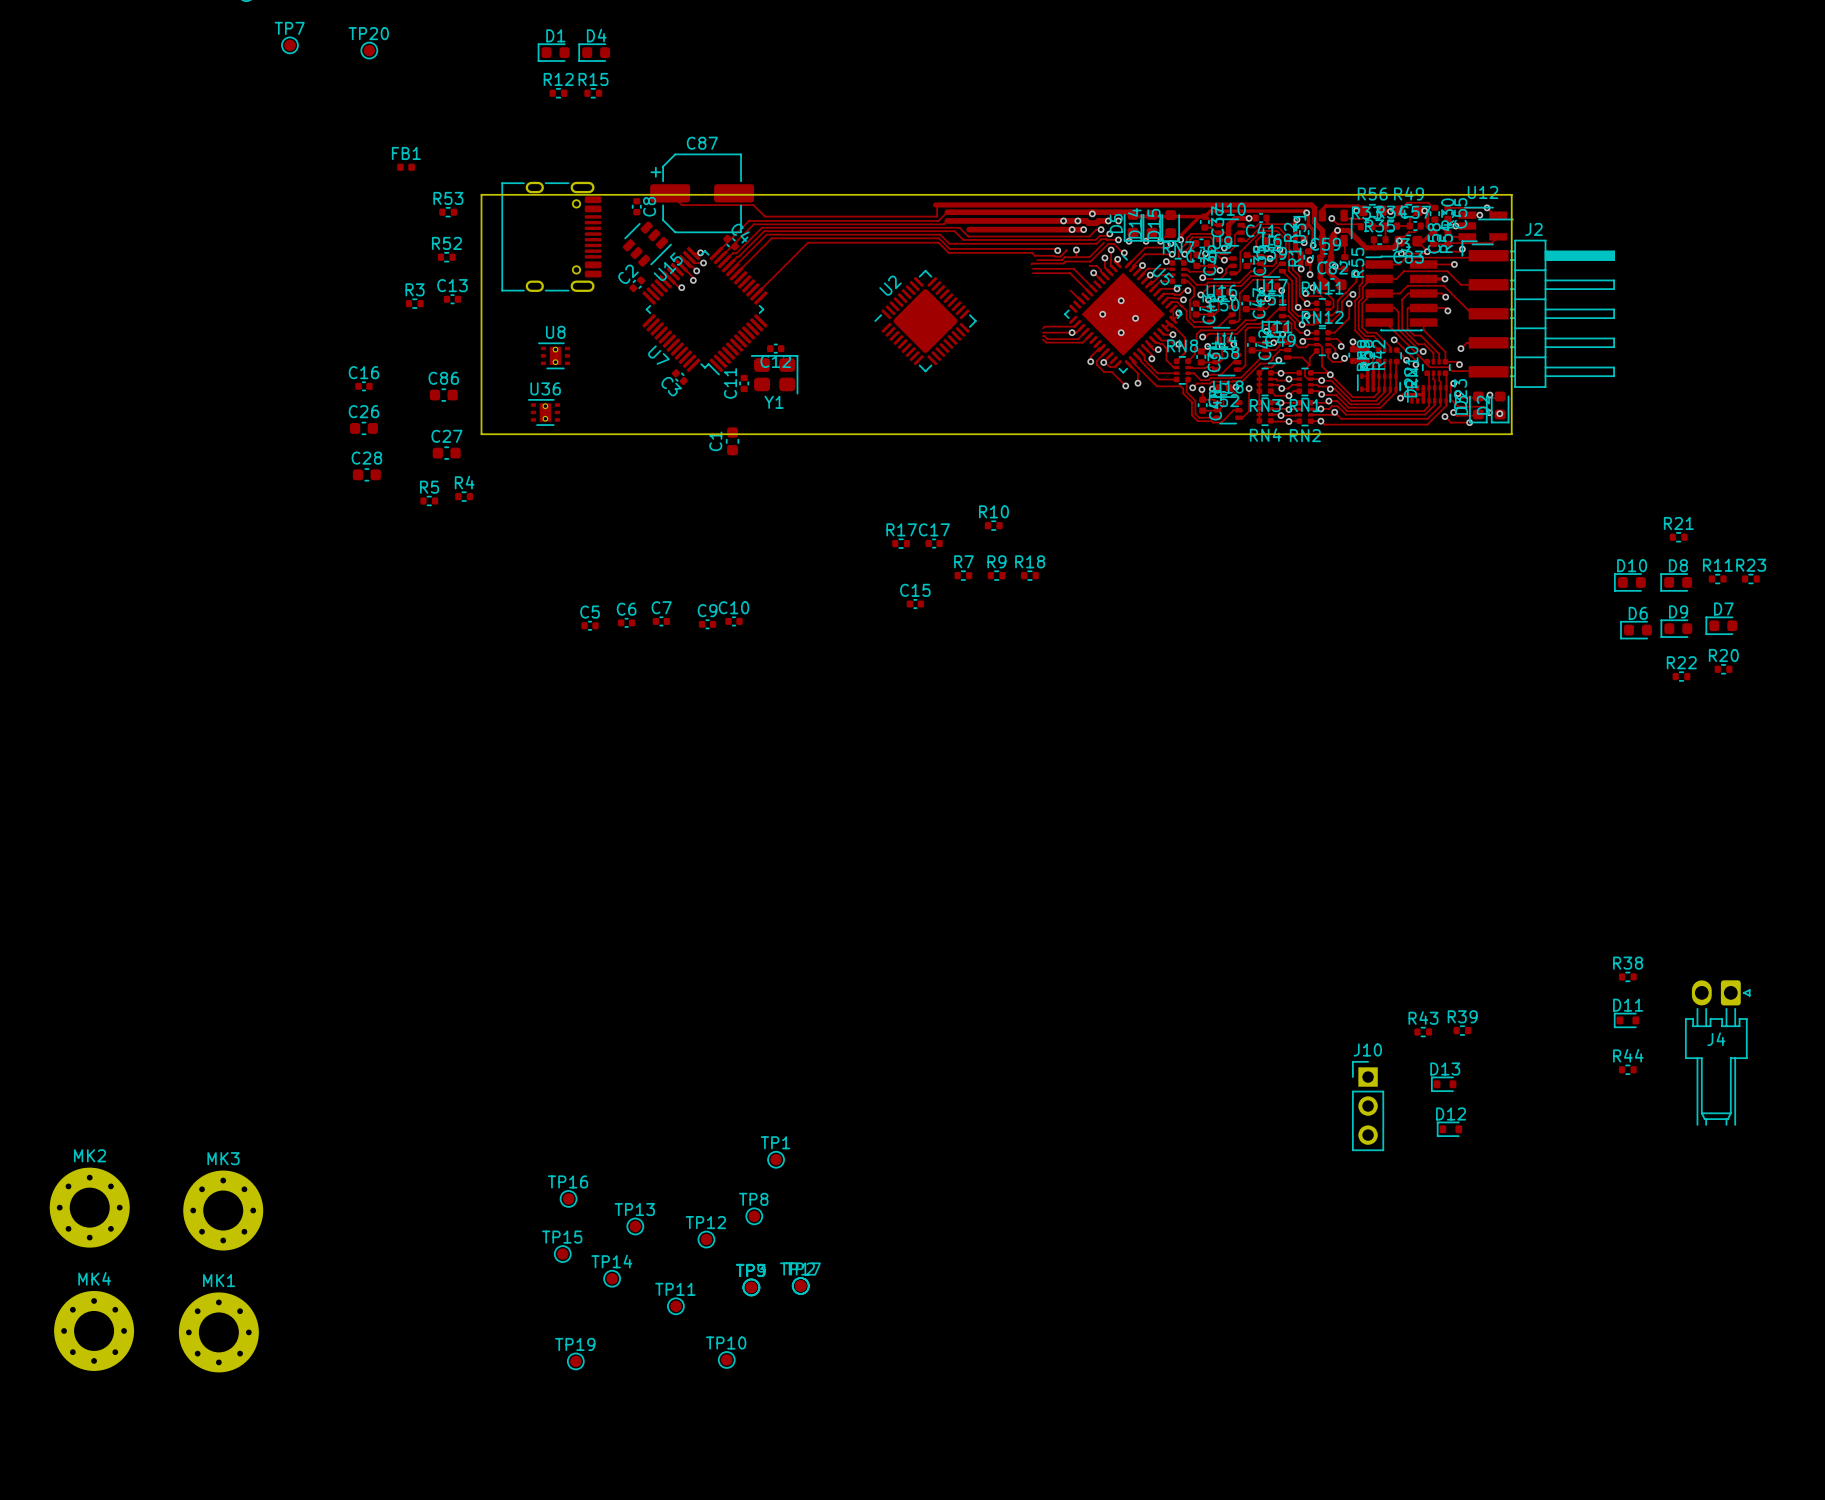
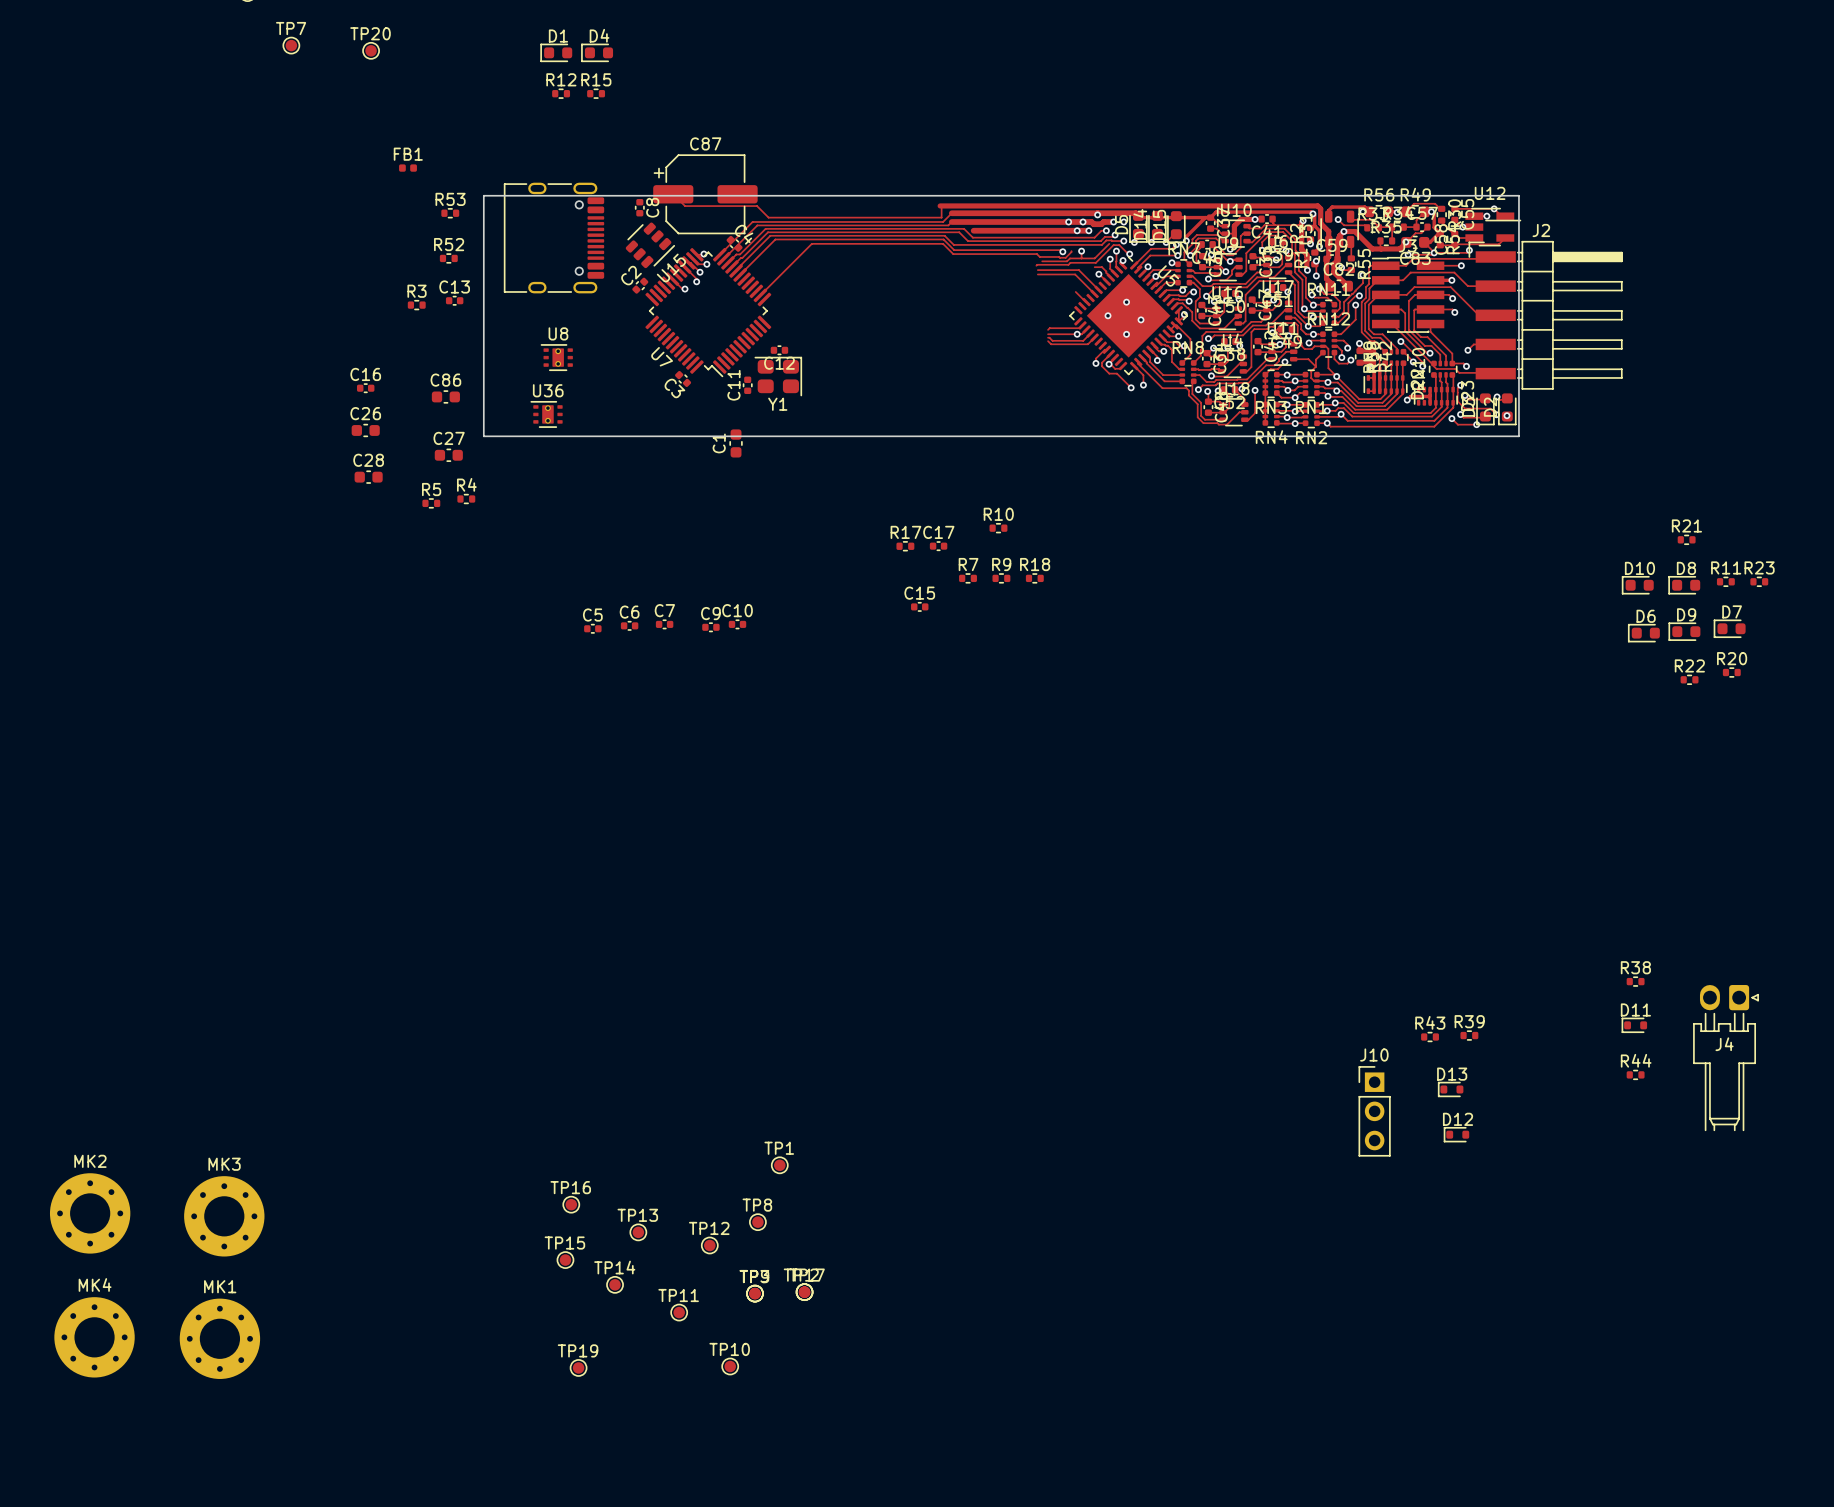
U2: (925, 321) -> none

